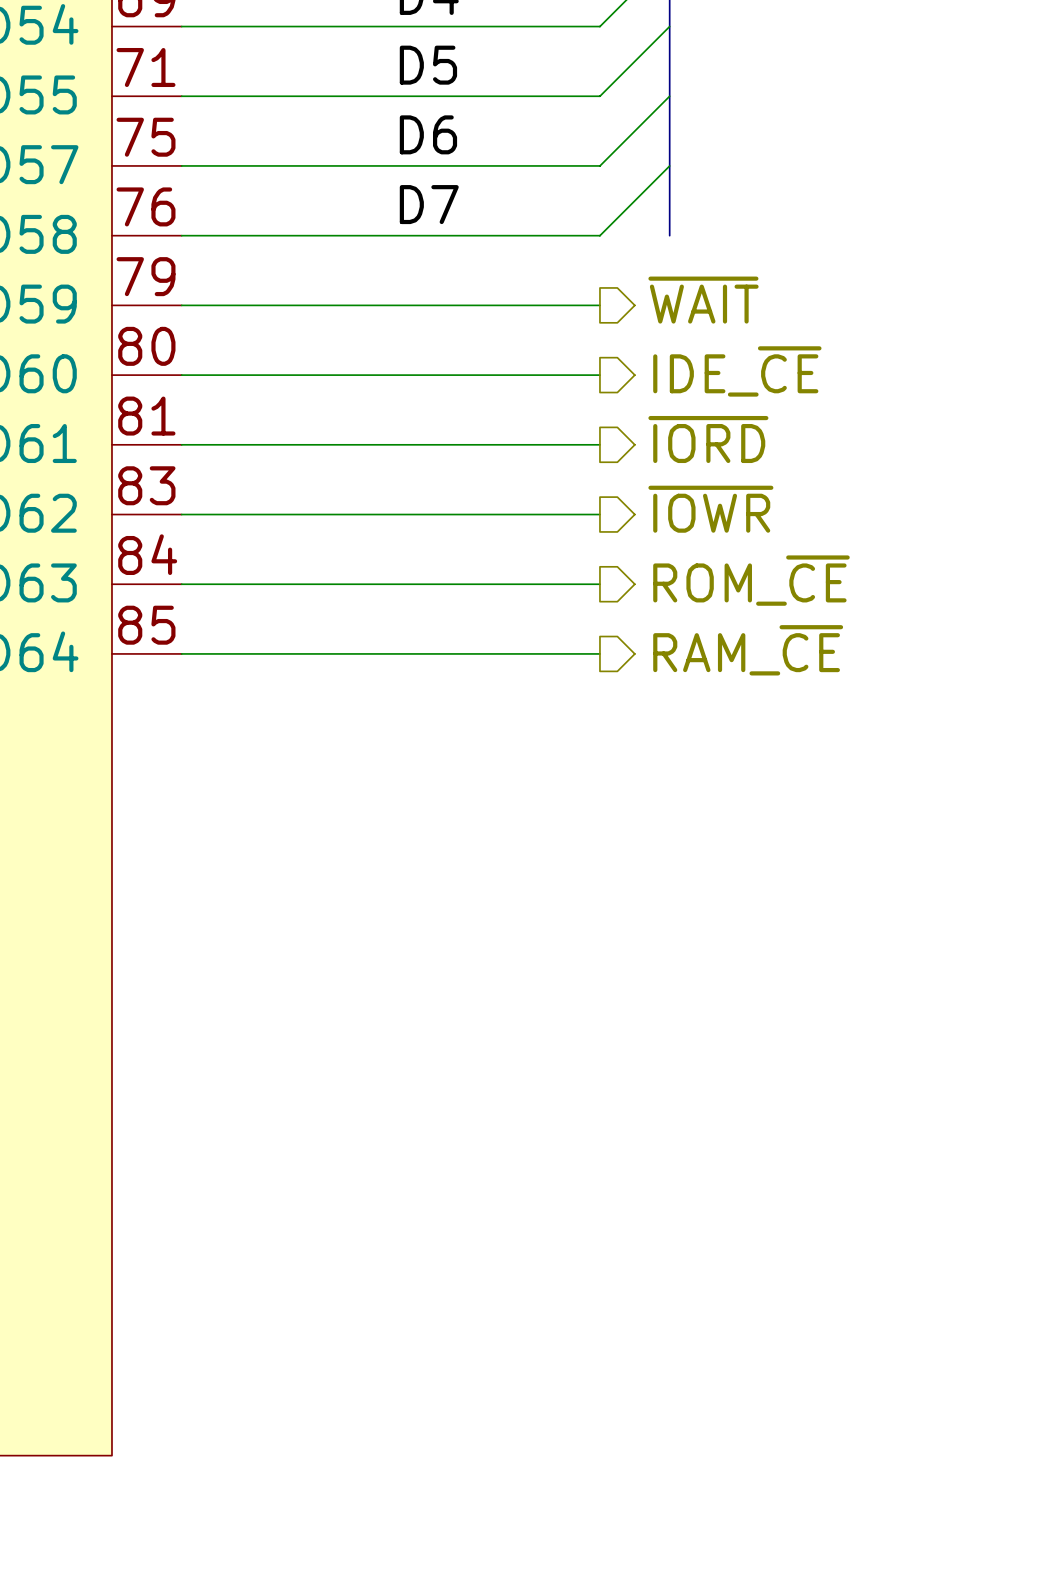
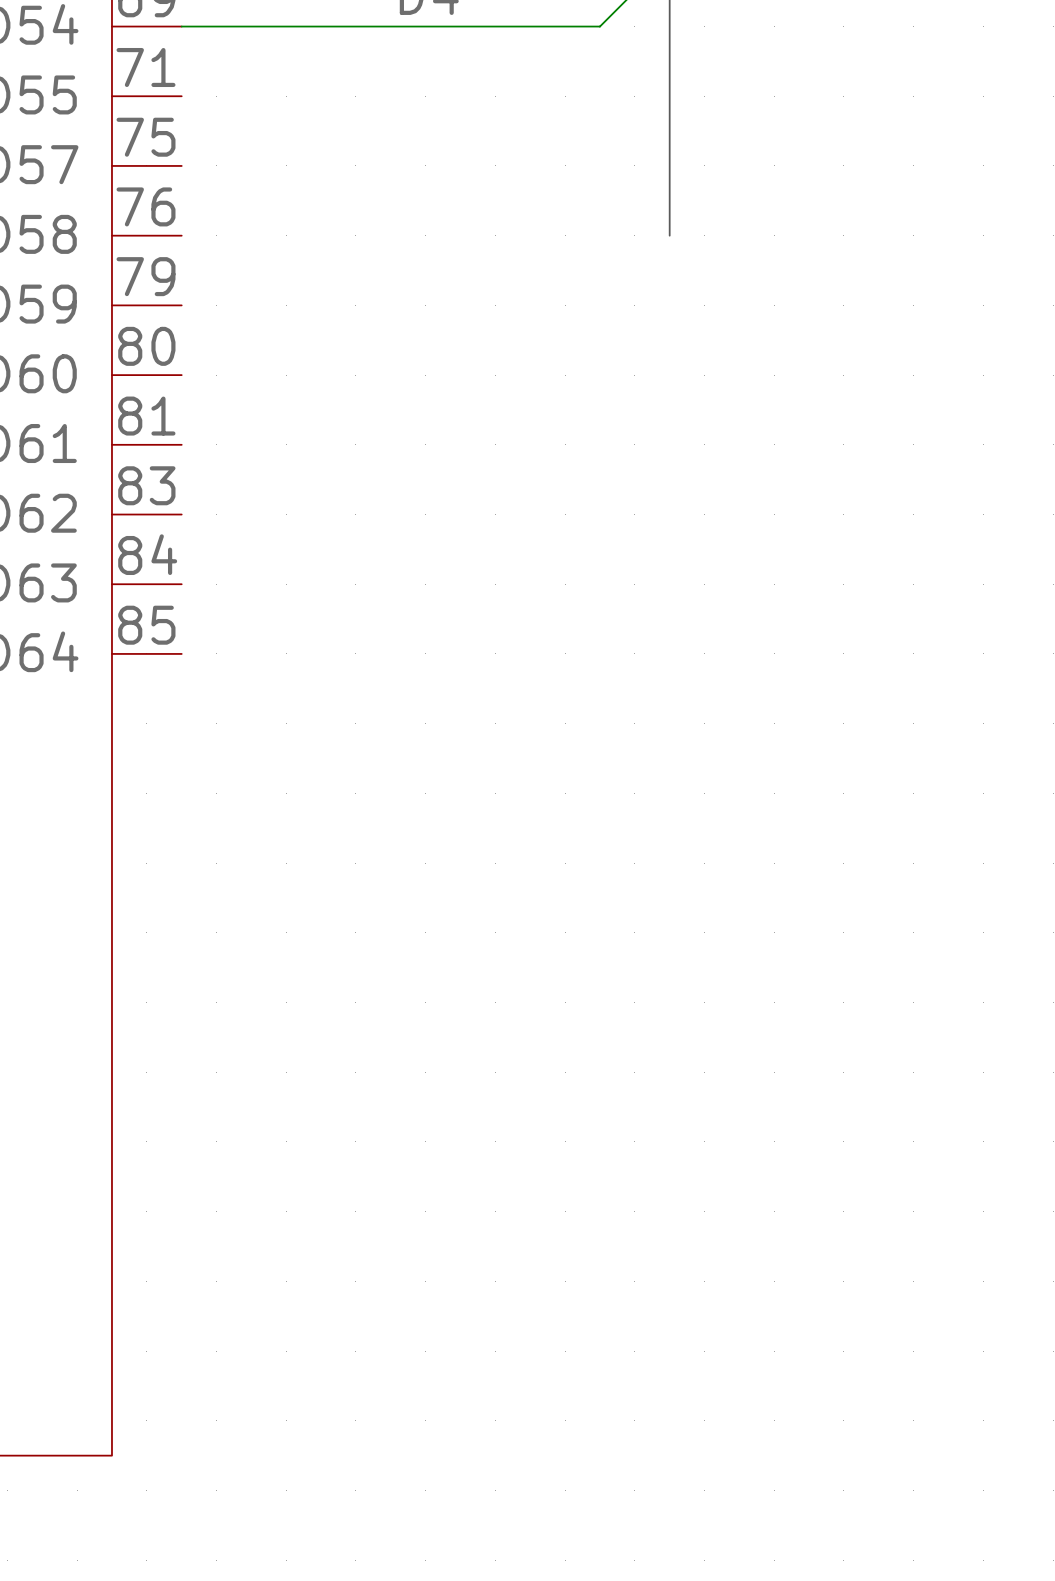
wire: (669, 26) (599, 96) (181, 96) -> none
label: D5 (428, 65) -> none
wire: (669, 96) (599, 165) (181, 165) -> none
label: D6 (428, 134) -> none
wire: (669, 165) (599, 235) (181, 235) -> none
label: D7 (429, 204) -> none
hierarchical label: ~{WAIT} (703, 300) -> none
wire: (181, 305) (599, 305) -> none
hierarchical label: IDE_~{CE} (737, 371) -> none
wire: (181, 375) (599, 375) -> none
hierarchical label: ~{IORD} (708, 439) -> none
wire: (181, 444) (599, 444) -> none
hierarchical label: ~{IOWR} (710, 509) -> none
wire: (181, 514) (599, 514) -> none
hierarchical label: ROM_~{CE} (751, 580) -> none
wire: (181, 584) (599, 584) -> none
hierarchical label: RAM_~{CE} (748, 650) -> none
wire: (181, 653) (599, 653) -> none

